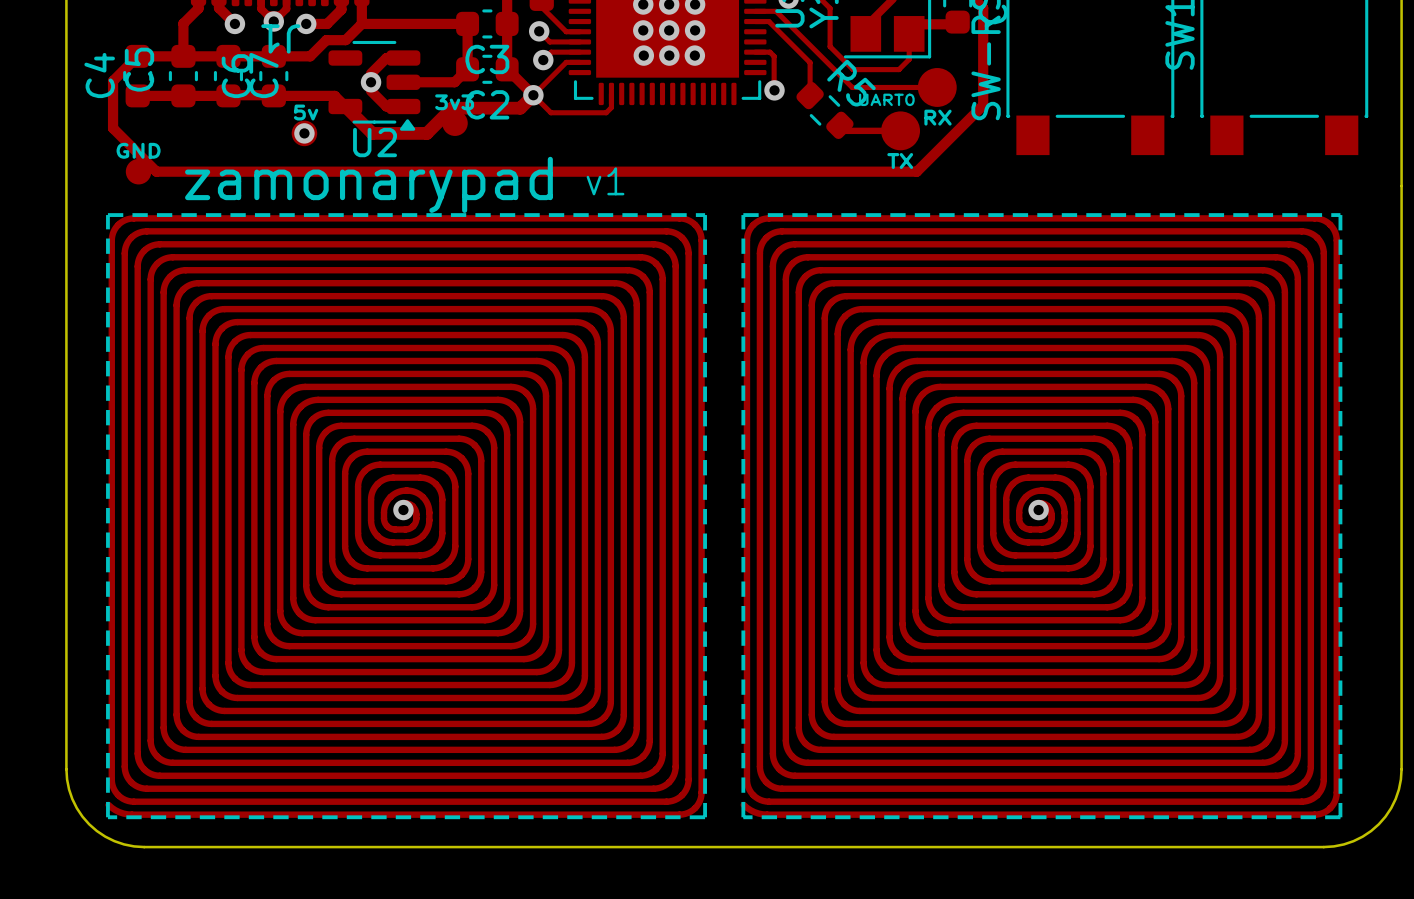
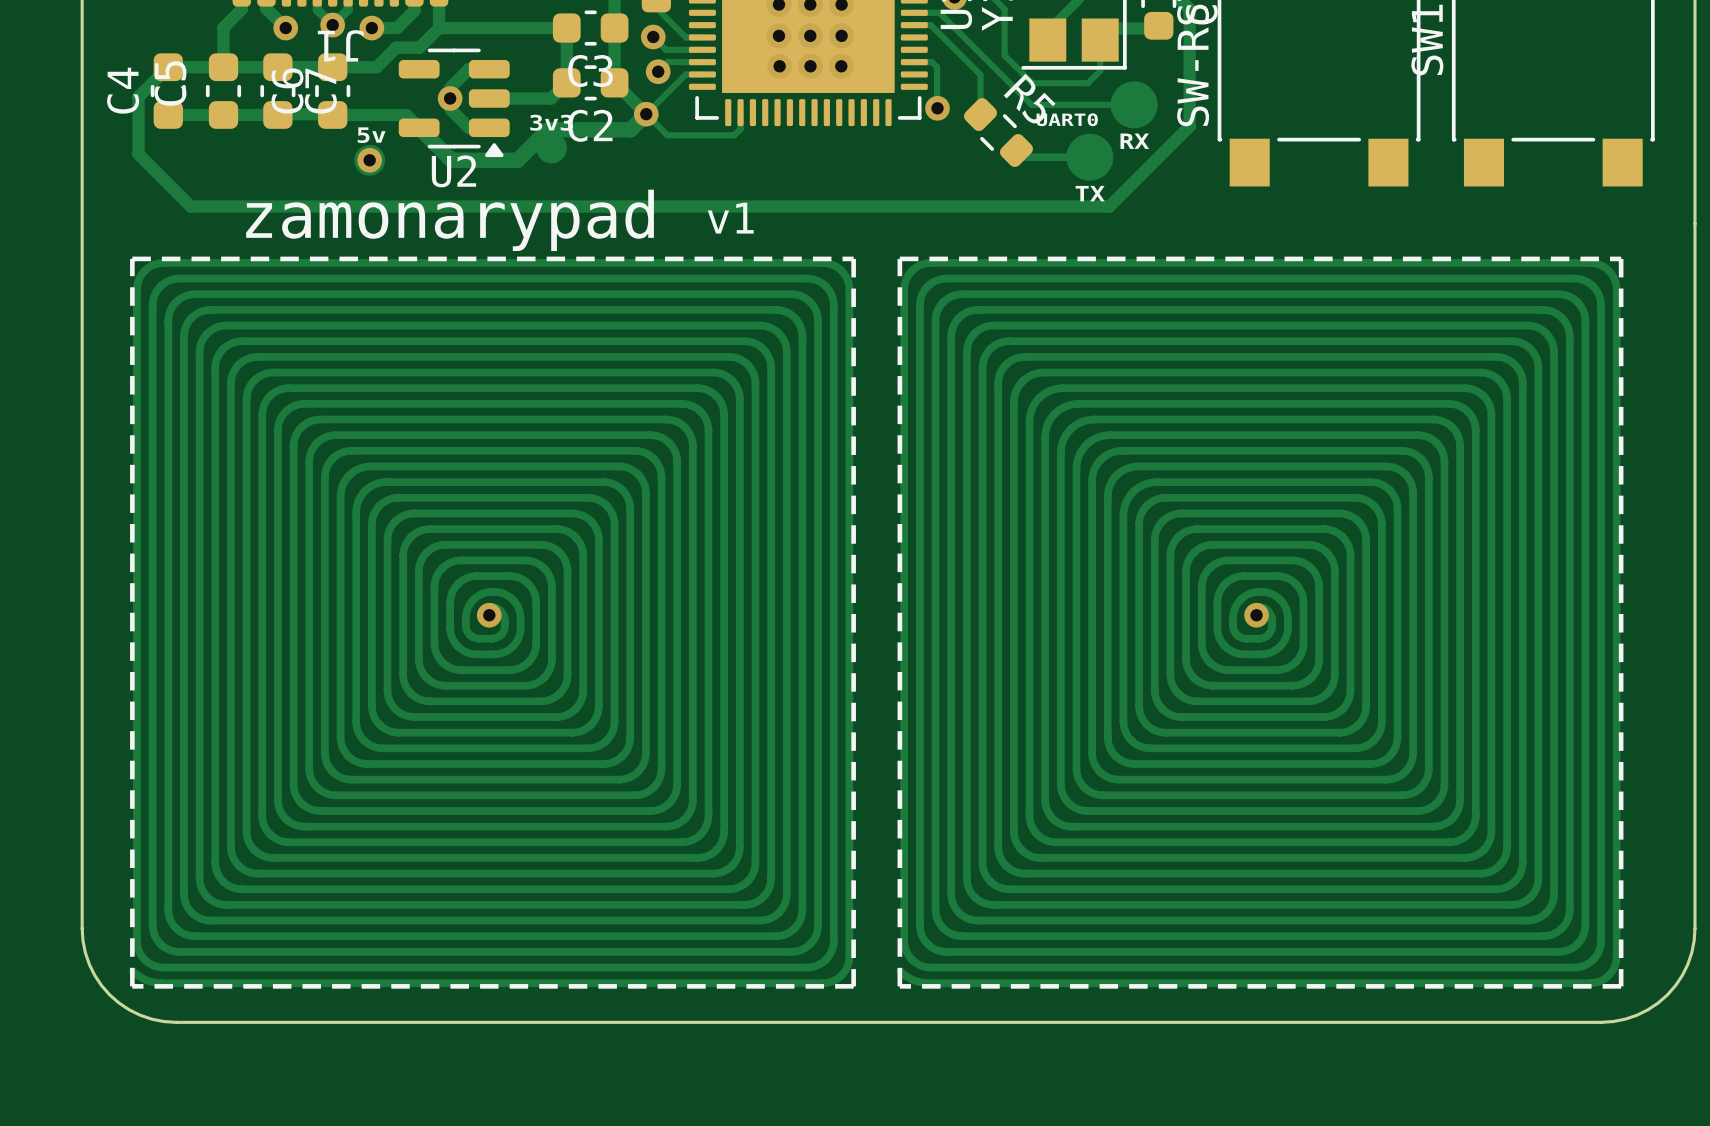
text: GND (138, 150) -> none
drawing: [125, 158, 152, 185] -> none

